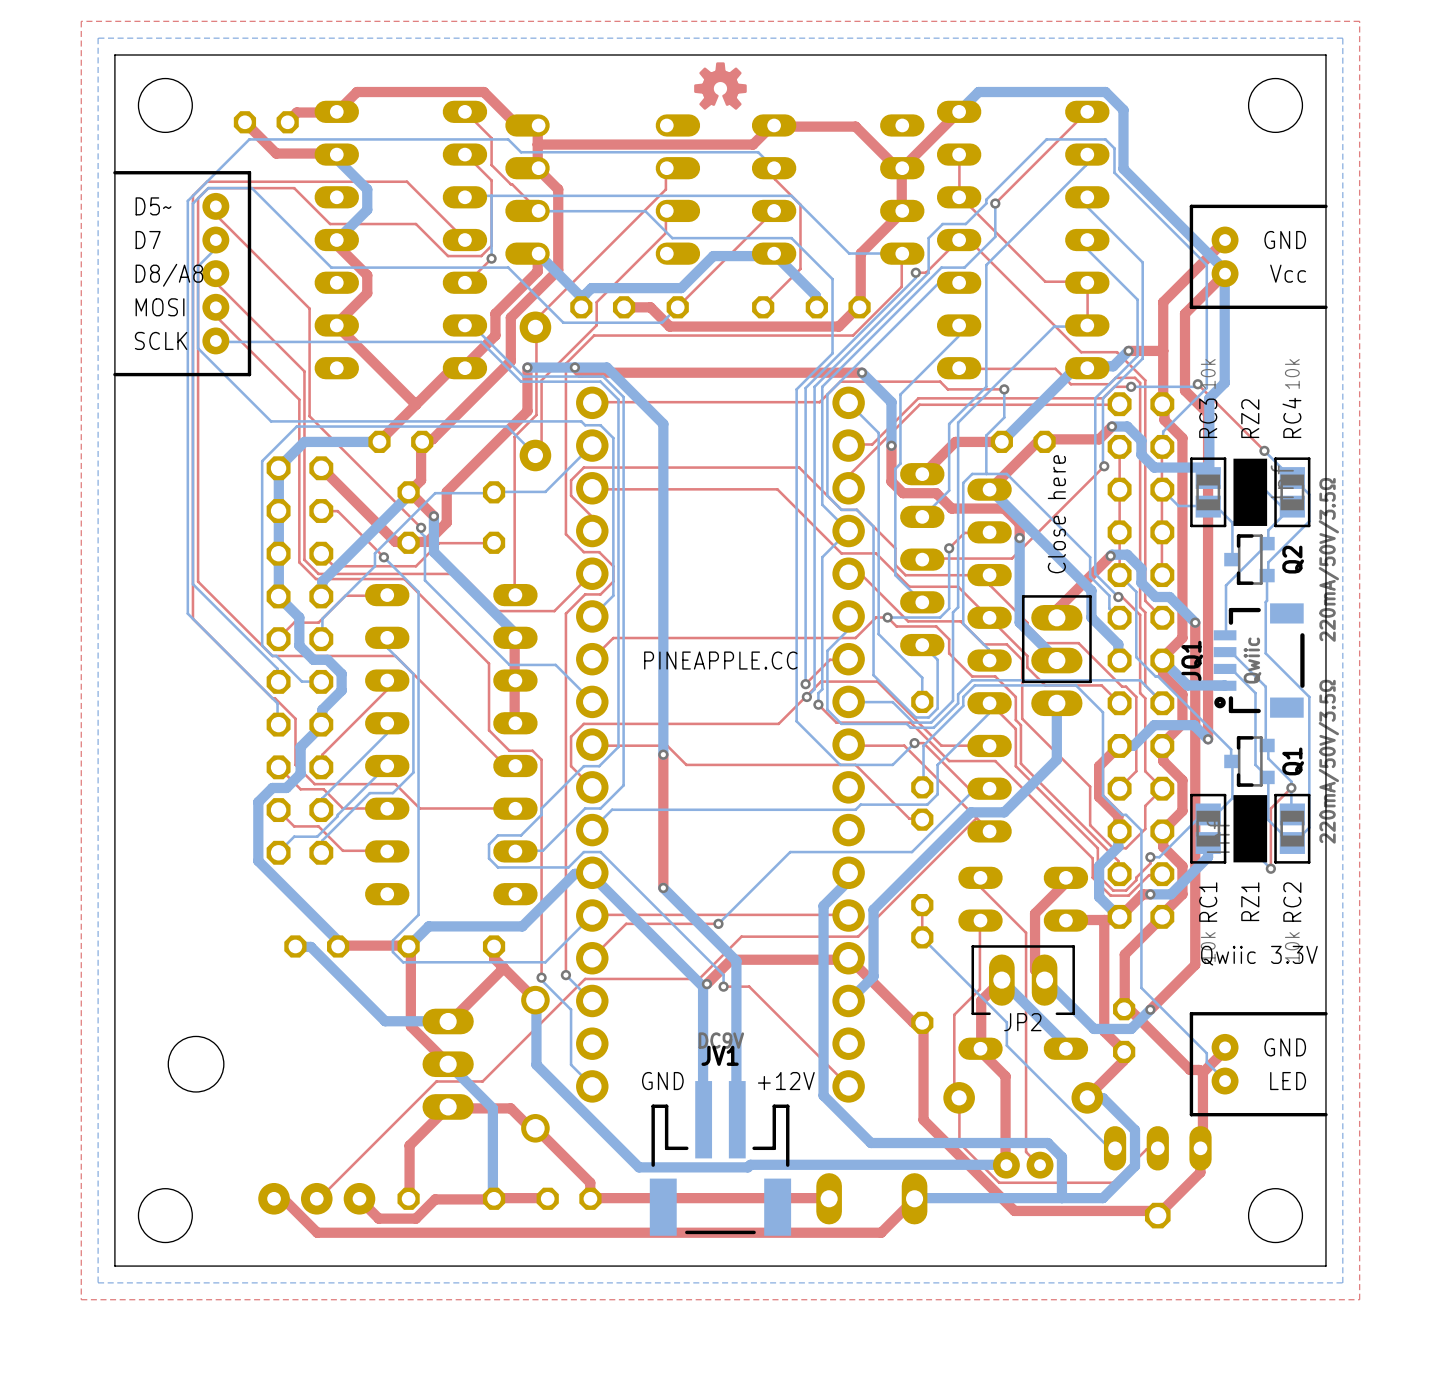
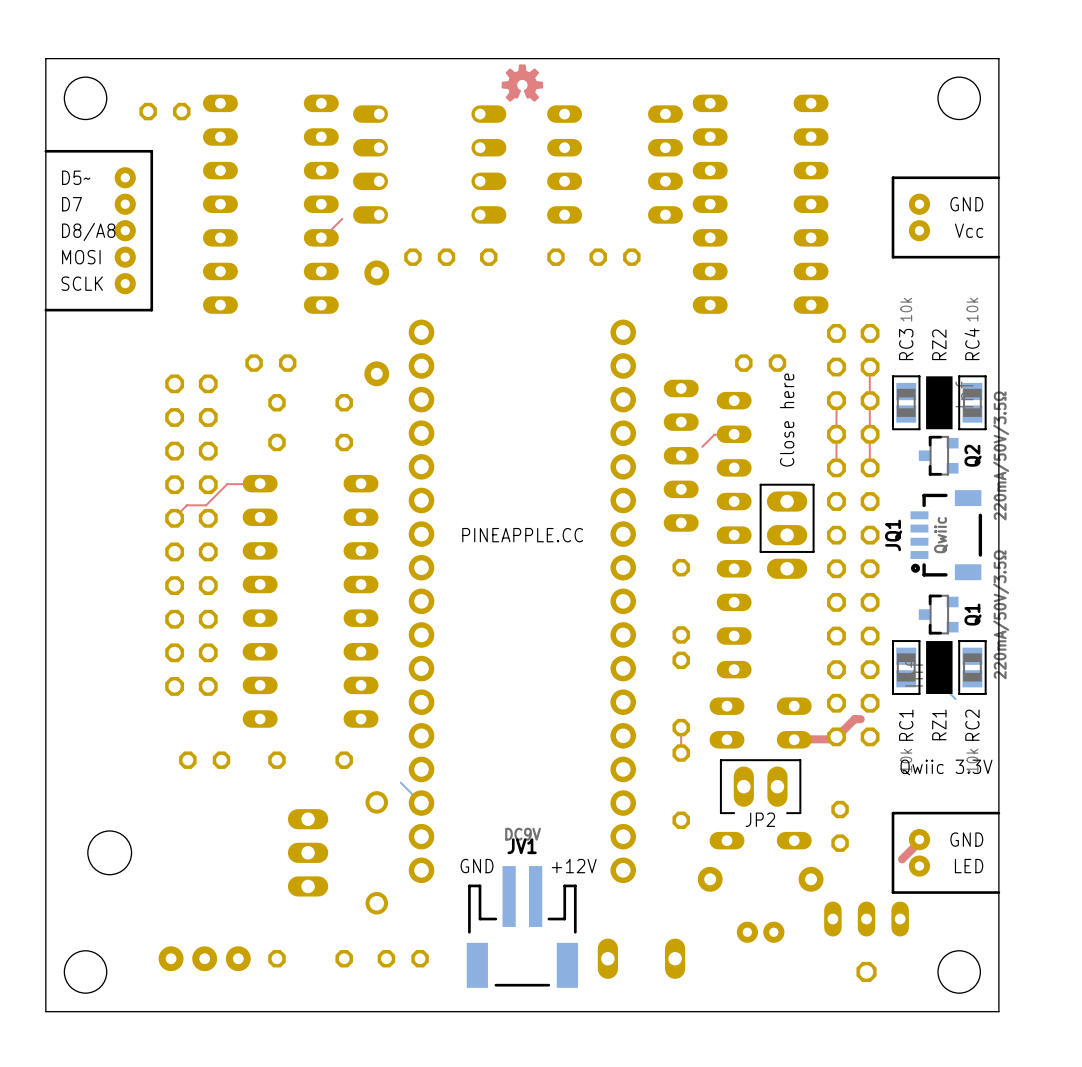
top zone outline: (1359, 21) (1359, 1299) (81, 1299) (81, 21) (1359, 21) -> none
bottom zone outline: (1342, 38) (1342, 1282) (98, 1282) (98, 38) (1342, 38) -> none
top track: (464, 111) (491, 138) (491, 165) (538, 210) -> none
top track: (959, 111) (902, 168) -> none
bottom track: (959, 111) (978, 92) (1105, 92) (1123, 109) (1123, 168) (1223, 268) (1225, 273) (1224, 382) (1209, 398) (1209, 477) (1205, 467) (1154, 467) (1141, 454) (1141, 440) (1127, 426) (1111, 426) -> none
top track: (1087, 111) (995, 203) -> none
top track: (244, 122) (276, 153) (336, 154) -> none
top track: (287, 122) (296, 112) (336, 112) (357, 92) (483, 92) (517, 125) (538, 125) (537, 167) (558, 189) (558, 270) (510, 317) (510, 361) (432, 439) (421, 441) (421, 480) (408, 492) (433, 516) -> none
top track: (537, 144) (753, 144) (774, 125) (855, 126) (896, 167) (902, 168) -> none
bottom track: (336, 154) (337, 159) (367, 189) (367, 209) (336, 240) -> none
top track: (464, 154) (491, 180) (491, 245) (481, 256) (448, 256) (415, 224) (330, 224) (294, 188) (208, 188) (198, 198) (198, 581) (272, 655) (395, 655) (504, 764) (515, 765) -> none
top track: (959, 154) (959, 197) -> none
bottom track: (1087, 154) (1086, 165) (986, 265) (986, 386) (949, 423) (949, 490) (922, 516) -> none
top track: (666, 168) (665, 189) (536, 318) (536, 415) (514, 436) (515, 595) -> none
top track: (774, 168) (774, 179) (800, 204) (800, 268) (763, 307) -> none
bottom track: (774, 168) (758, 152) (521, 152) (508, 139) (249, 139) (187, 200) (187, 613) (277, 703) (278, 724) -> none
top track: (902, 168) (902, 210) (860, 253) (860, 306) (838, 326) (669, 326) (650, 307) (624, 307) -> none
bottom track: (491, 195) (491, 258) -> none
bottom track: (464, 197) (791, 195) (849, 253) (902, 253) -> none
top track: (959, 197) (1045, 281) (1086, 281) (1087, 325) -> none
bottom track: (1087, 197) (1087, 207) (1142, 262) (1142, 358) (1102, 398) (1104, 466) -> none
bottom track: (995, 203) (995, 236) (964, 267) (941, 267) (822, 386) (822, 504) (848, 531) (822, 557) (822, 689) (818, 693) (818, 704) -> none
via: (995, 203) -> none
top track: (215, 206) (216, 215) (309, 308) (309, 416) (421, 527) -> none
bottom track: (538, 210) (645, 211) (672, 238) (791, 238) (832, 279) (832, 353) (796, 389) (796, 721) (840, 764) (892, 764) (914, 743) -> none
top track: (666, 210) (665, 233) (596, 302) (596, 325) (541, 380) (541, 449) (535, 455) -> none
top track: (774, 210) (677, 307) -> none
bottom track: (215, 240) (214, 249) (198, 266) (198, 348) (271, 421) (581, 421) (585, 425) (600, 425) (613, 438) (613, 595) (592, 616) -> none
top track: (336, 240) (337, 245) (367, 275) (367, 293) (336, 325) (415, 404) -> none
top track: (464, 240) (407, 181) (207, 181) (192, 195) (192, 618) (295, 718) (295, 764) (314, 784) (395, 784) (419, 808) (515, 808) -> none
bottom track: (1087, 240) (1087, 249) (1137, 299) (1137, 356) (1095, 398) (1095, 573) (1118, 597) -> none
top track: (1225, 240) (1163, 302) (1162, 404) (1164, 408) (1164, 420) (1182, 438) (1182, 638) (1162, 660) (1163, 675) (1182, 694) (1182, 723) (1162, 745) (1163, 761) (1182, 780) (1182, 811) (1162, 831) (1163, 846) (1182, 866) (1182, 894) (1124, 954) (1124, 1009) (1129, 1009) (1190, 1069) (1199, 1069) (1202, 1072) (1202, 1144) (1200, 1149) (1200, 1172) (1157, 1215) (1154, 1210) (1014, 1210) (923, 1119) (922, 1022) -> none
top track: (538, 253) (537, 271) (495, 313) (495, 335) (467, 363) (464, 368) (451, 368) (379, 441) -> none
bottom track: (538, 253) (581, 297) -> none
top track: (902, 253) (901, 286) (853, 335) (594, 335) (565, 363) (565, 534) (583, 552) (599, 552) (613, 566) (613, 581) (600, 594) (585, 594) (565, 613) (565, 975) -> none
via: (491, 258) -> none
top track: (915, 272) (926, 272) (959, 240) (969, 240) (1081, 352) (1117, 352) (1145, 380) (1145, 600) (1162, 617) -> none
bottom track: (915, 272) (915, 277) (805, 388) (805, 684) -> none
via: (915, 272) -> none
top track: (215, 273) (216, 282) (304, 371) (304, 559) (318, 573) (460, 573) (498, 611) (554, 611) (592, 573) -> none
top track: (1225, 273) (1185, 313) (1185, 390) (1208, 413) (1208, 739) -> none
bottom track: (959, 282) (938, 282) (827, 394) (827, 495) (841, 509) (856, 509) (873, 526) (873, 675) (915, 717) (928, 717) (937, 708) (937, 659) (922, 645) -> none
bottom track: (581, 297) (591, 288) (681, 288) (713, 256) (769, 256) (774, 253) (815, 295) (816, 307) -> none
top track: (216, 307) (216, 316) (299, 399) (299, 562) (316, 579) (404, 579) (489, 663) (489, 730) (509, 750) (532, 750) (541, 759) (541, 977) -> none
bottom track: (677, 307) (662, 322) (563, 322) (508, 267) (331, 267) (251, 188) (208, 188) (192, 203) (192, 584) (277, 668) (278, 681) -> none
bottom track: (464, 325) (473, 326) (523, 376) (603, 376) (623, 397) (623, 785) (600, 808) (585, 808) (542, 850) (515, 851) -> none
bottom track: (959, 325) (958, 336) (900, 394) (900, 463) (895, 468) (895, 575) (922, 602) -> none
bottom track: (1087, 325) (1054, 326) (958, 422) (958, 607) (953, 612) (953, 700) (931, 722) (913, 722) (892, 702) (848, 701) -> none
bottom track: (215, 340) (481, 341) (521, 381) (600, 381) (618, 399) (618, 746) (599, 766) (583, 766) (541, 808) (541, 814) (521, 835) (498, 835) (489, 844) (489, 858) (498, 867) (568, 867) (583, 852) (600, 852) (723, 975) (723, 986) -> none
bottom track: (1128, 350) (1113, 366) (1074, 368) (1001, 441) -> none
via: (1128, 350) -> none
top track: (1163, 350) (1128, 350) -> none
top track: (527, 367) (527, 411) (446, 491) (446, 522) (427, 541) (395, 541) (321, 468) -> none
bottom track: (527, 367) (606, 367) (663, 423) (663, 754) -> none
via: (527, 367) -> none
top track: (574, 367) (580, 372) (862, 372) -> none
via: (574, 367) -> none
top track: (959, 368) (1055, 368) (1070, 384) (1109, 384) (1115, 377) (1135, 377) (1140, 382) (1140, 607) (1145, 612) (1145, 685) (1162, 703) -> none
bottom track: (862, 372) (891, 402) (891, 445) -> none
via: (862, 372) -> none
top track: (1197, 384) (1264, 450) -> none
bottom track: (1197, 384) (1195, 386) (1131, 386) -> none
via: (1197, 384) -> none
top track: (1131, 386) (1114, 386) (1102, 398) (918, 398) (872, 444) (848, 445) -> none
via: (1131, 386) -> none
top track: (1004, 389) (947, 389) (940, 381) (840, 381) (819, 402) (592, 402) -> none
bottom track: (1004, 389) (1004, 417) (986, 435) (986, 473) -> none
via: (1004, 389) -> none
bottom track: (848, 402) (878, 432) (878, 634) (922, 677) (922, 701) -> none
top track: (1119, 404) (919, 404) (849, 475) (848, 488) -> none
top track: (1111, 426) (1099, 439) (1049, 439) (1037, 441) (989, 489) -> none
via: (1111, 426) -> none
bottom track: (379, 441) (304, 441) (278, 468) (278, 596) (299, 617) (299, 645) (313, 659) (327, 659) (341, 673) (341, 690) (322, 709) (322, 723) (300, 746) (300, 773) (286, 787) (272, 787) (258, 802) (258, 861) (337, 940) (338, 946) -> none
top track: (1001, 441) (955, 441) (922, 474) -> none
bottom track: (592, 445) (545, 491) (435, 493) (374, 553) (374, 566) (322, 618) (321, 639) -> none
top track: (891, 445) (891, 481) (903, 493) (936, 493) (951, 508) (1004, 508) (1019, 523) (1019, 538) -> none
via: (891, 445) -> none
bottom track: (1162, 446) (1163, 431) (1206, 388) (1206, 265) (1114, 172) (1114, 148) (1105, 139) (1046, 139) (986, 199) (986, 203) (965, 224) (942, 224) (928, 238) (928, 272) (814, 386) (814, 689) (806, 696) -> none
top track: (1119, 447) (1119, 489) -> none
bottom track: (1264, 450) (1309, 494) (1309, 521) (1268, 562) (1265, 602) (1265, 653) (1309, 696) (1309, 827) (1292, 843) (1268, 820) (1268, 777) (1255, 764) (1255, 693) (1232, 670) (1225, 668) -> none
via: (1264, 450) -> none
bottom track: (535, 455) (506, 426) (296, 426) (262, 461) (262, 645) (272, 655) (276, 655) (301, 681) (321, 681) -> none
top track: (1104, 466) (1011, 558) (922, 559) -> none
via: (1104, 466) -> none
bottom track: (1250, 478) (1254, 479) (1286, 511) (1292, 506) (1268, 530) (1268, 543) (1226, 585) (1225, 635) -> none
top track: (592, 488) (777, 489) (841, 553) (876, 553) (909, 586) (958, 586) (1027, 655) (1027, 667) (1045, 685) (1101, 685) (1119, 703) -> none
bottom track: (989, 489) (1091, 590) (1091, 617) (1118, 644) (1119, 660) -> none
bottom track: (1162, 489) (1178, 506) (1217, 507) (1233, 523) -> none
bottom track: (408, 492) (408, 495) (322, 581) (321, 596) -> none
bottom track: (1250, 506) (1232, 523) (1231, 559) -> none
top track: (321, 510) (337, 511) (383, 557) -> none
bottom track: (433, 516) (433, 552) (514, 632) (515, 637) -> none
via: (433, 516) -> none
bottom track: (421, 527) (421, 532) (424, 536) (424, 580) (509, 664) (555, 664) (592, 701) -> none
via: (421, 527) -> none
top track: (592, 531) (591, 516) (571, 495) (571, 480) (583, 467) (799, 467) (841, 509) (856, 509) (895, 548) (895, 564) (905, 575) (990, 575) (990, 585) (1045, 643) (1078, 643) (1122, 686) (1126, 686) (1136, 696) (1136, 771) (1119, 788) -> none
bottom track: (1019, 538) (1019, 622) (1056, 660) -> none
via: (1019, 538) -> none
top track: (494, 542) (439, 543) (415, 566) (333, 566) (321, 553) -> none
bottom track: (949, 548) (949, 608) (940, 617) (887, 617) -> none
via: (949, 548) -> none
top track: (1110, 555) (1058, 608) (1056, 617) -> none
bottom track: (1110, 555) (1127, 554) (1141, 568) (1141, 582) (1155, 597) (1169, 597) (1195, 622) -> none
via: (1110, 555) -> none
bottom track: (383, 557) (418, 591) (418, 914) (392, 940) (392, 952) (403, 962) (545, 962) (592, 915) -> none
via: (383, 557) -> none
top track: (848, 573) (860, 573) (908, 621) (960, 621) (983, 644) (1006, 644) (1022, 659) (1022, 718) (1090, 786) (1090, 825) (1113, 848) (1126, 848) (1145, 829) (1145, 805) (1162, 788) (1145, 771) (1145, 698) (1140, 693) (1140, 614) (1122, 597) (1118, 597) -> none
bottom track: (1119, 575) (1136, 591) (1136, 657) (1231, 749) (1232, 796) (1250, 814) -> none
via: (1118, 597) -> none
bottom track: (848, 616) (847, 630) (827, 650) (827, 709) (841, 723) (906, 723) (910, 727) (933, 727) (958, 703) (958, 694) (972, 680) (1140, 680) (1162, 703) -> none
via: (887, 617) -> none
bottom track: (1119, 617) (1109, 608) (1109, 595) (1090, 576) (1090, 557) (1006, 473) (972, 473) (963, 482) (963, 623) (988, 649) (989, 660) -> none
top track: (1195, 622) (1195, 964) (1150, 1009) -> none
via: (1195, 622) -> none
bottom track: (387, 637) (387, 648) (413, 673) (413, 772) (392, 793) (369, 793) (322, 840) (321, 852) -> none
top track: (515, 637) (515, 723) -> none
bottom track: (1225, 652) (1231, 652) (1265, 686) (1265, 743) (1268, 745) (1268, 758) (1291, 781) (1292, 814) -> none
top track: (592, 659) (613, 638) (855, 638) (876, 617) (887, 617) (896, 626) (936, 626) (949, 639) (949, 653) (972, 676) (995, 676) (1015, 696) (1015, 720) (1020, 725) (1020, 763) (1118, 861) (1119, 874) -> none
top track: (848, 659) (829, 659) (805, 684) -> none
bottom track: (1162, 660) (1187, 685) (1225, 685) -> none
top track: (387, 680) (386, 690) (322, 754) (321, 767) -> none
via: (805, 684) -> none
via: (806, 696) -> none
top track: (989, 703) (1015, 729) (1015, 766) (1097, 848) (1097, 875) (1113, 890) (1126, 890) (1150, 863) (1150, 857) -> none
bottom track: (989, 703) (988, 713) (937, 764) (937, 794) (927, 804) (860, 804) (855, 809) (612, 809) (592, 830) -> none
bottom track: (1056, 703) (1056, 759) (1004, 812) (970, 812) (873, 909) (873, 976) (848, 1000) -> none
top track: (818, 704) (836, 722) (910, 722) (949, 761) (995, 761) (1092, 858) (1092, 877) (1110, 895) (1128, 895) (1149, 875) (1162, 874) -> none
via: (818, 704) -> none
bottom track: (387, 723) (386, 734) (322, 798) (321, 810) -> none
bottom track: (1208, 739) (1193, 725) (1154, 725) (1133, 745) (1119, 745) -> none
via: (1208, 739) -> none
top track: (914, 743) (923, 743) (968, 787) (989, 788) -> none
via: (914, 743) -> none
top track: (592, 744) (667, 745) (686, 764) (855, 764) (909, 818) (922, 819) -> none
top track: (848, 744) (904, 745) (989, 831) -> none
top track: (989, 745) (941, 745) (877, 681) (820, 681) (778, 723) (583, 723) (571, 736) (571, 766) (592, 787) -> none
top track: (1119, 745) (1099, 766) (1099, 796) (1118, 816) (1119, 831) -> none
top track: (663, 754) (663, 887) -> none
via: (663, 754) -> none
bottom track: (387, 765) (317, 836) (294, 836) (278, 852) -> none
top track: (278, 767) (300, 789) (323, 789) (342, 808) (387, 808) -> none
bottom track: (922, 787) (923, 745) (963, 705) (963, 696) (974, 685) (1076, 685) (1102, 712) (1102, 795) (1141, 830) (1141, 987) (1206, 1053) (1206, 1062) (1225, 1081) -> none
top track: (1291, 787) (1270, 808) (1270, 868) -> none
via: (1291, 787) -> none
bottom track: (989, 788) (974, 789) (911, 852) (790, 852) (718, 923) -> none
bottom track: (1233, 797) (1217, 813) (1201, 814) (1159, 857) (1150, 857) -> none
top track: (278, 810) (294, 826) (318, 826) (342, 850) (387, 851) -> none
top track: (976, 818) (858, 936) (741, 936) (699, 978) (585, 978) (482, 1081) (436, 1081) (319, 1198) (316, 1198) -> none
bottom track: (1119, 831) (1118, 846) (1099, 866) (1099, 896) (1119, 916) -> none
bottom track: (1208, 843) (1208, 857) (1170, 894) (1150, 894) -> none
via: (1150, 857) -> none
via: (1270, 868) -> none
bottom track: (848, 872) (847, 881) (823, 905) (823, 1095) (870, 1143) (1047, 1143) (1061, 1157) (1061, 1198) -> none
top track: (980, 877) (981, 887) (1026, 932) (1026, 1151) (1040, 1165) -> none
top track: (1065, 877) (1065, 882) (1035, 913) (1035, 969) (1044, 980) -> none
bottom track: (663, 887) (736, 961) (737, 1119) -> none
via: (663, 887) -> none
via: (1150, 894) -> none
top track: (848, 915) (592, 915) -> none
top track: (980, 920) (979, 989) (954, 1014) (954, 1093) (959, 1098) (959, 1143) (999, 1182) (1113, 1182) (1146, 1149) (1157, 1148) -> none
top track: (1104, 920) (1104, 1031) (1124, 1051) (1123, 1060) (1087, 1097) -> none
top track: (718, 923) (626, 923) (592, 958) -> none
via: (718, 923) -> none
bottom track: (922, 937) (1006, 1022) (1006, 1045) (1109, 1148) (1115, 1148) -> none
bottom track: (295, 946) (310, 946) (385, 1021) (448, 1021) -> none
top track: (338, 946) (408, 945) (410, 950) (410, 1026) (448, 1064) -> none
bottom track: (408, 946) (428, 926) (522, 926) (574, 873) (592, 872) (594, 877) (703, 986) -> none
top track: (494, 946) (494, 958) (535, 1000) -> none
top track: (503, 968) (449, 1022) (448, 1021) -> none
via: (565, 975) -> none
bottom track: (541, 977) (541, 980) (571, 1009) (571, 1064) (592, 1086) -> none
via: (541, 977) -> none
top track: (1001, 980) (981, 1000) (980, 1048) (982, 1053) (1005, 1076) (1006, 1165) -> none
bottom track: (1001, 980) (1065, 1044) (1065, 1048) -> none
bottom track: (1044, 980) (1093, 1028) (1131, 1028) (1150, 1009) -> none
top track: (706, 984) (731, 959) (848, 958) (913, 1022) (922, 1022) -> none
via: (706, 984) -> none
bottom track: (703, 986) (703, 1119) -> none
top track: (723, 986) (749, 986) (848, 1086) -> none
via: (723, 986) -> none
bottom track: (535, 1000) (536, 1064) (638, 1167) (747, 1167) (750, 1164) (1006, 1165) -> none
via: (1150, 1009) -> none
bottom track: (448, 1064) (492, 1108) (494, 1198) -> none
bottom track: (1087, 1097) (1102, 1098) (1135, 1130) (1135, 1166) (1102, 1198) (914, 1198) -> none
top track: (448, 1106) (510, 1108) (530, 1127) (536, 1128) (590, 1182) (590, 1198) (829, 1198) -> none
top track: (448, 1107) (409, 1145) (408, 1198) -> none
top track: (547, 1198) (435, 1199) (415, 1218) (378, 1218) (359, 1198) -> none
top track: (914, 1198) (881, 1232) (317, 1232) (283, 1199) (274, 1198) -> none

